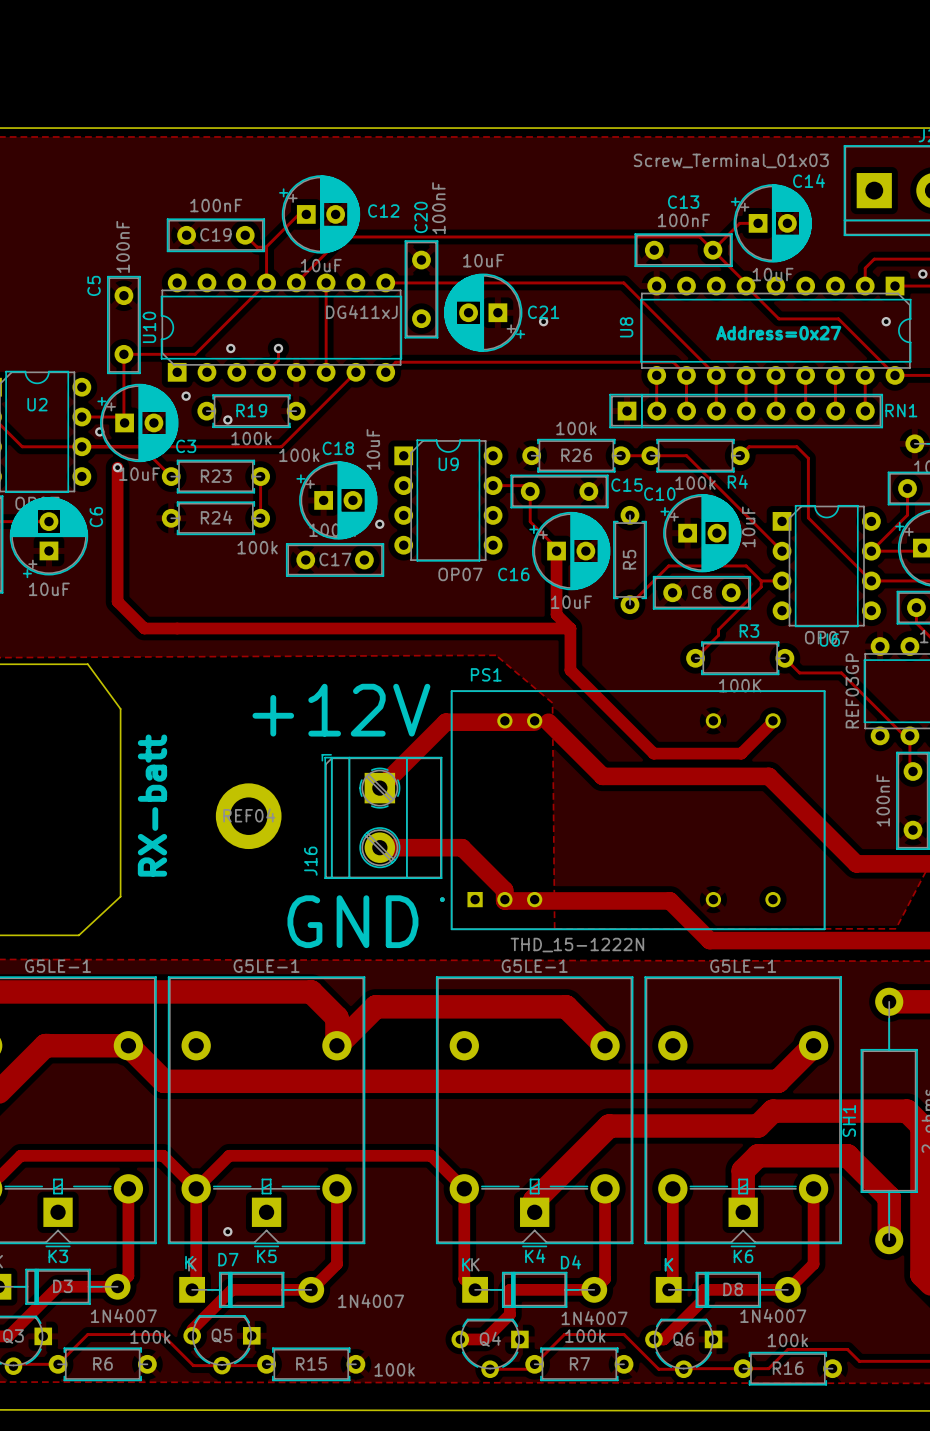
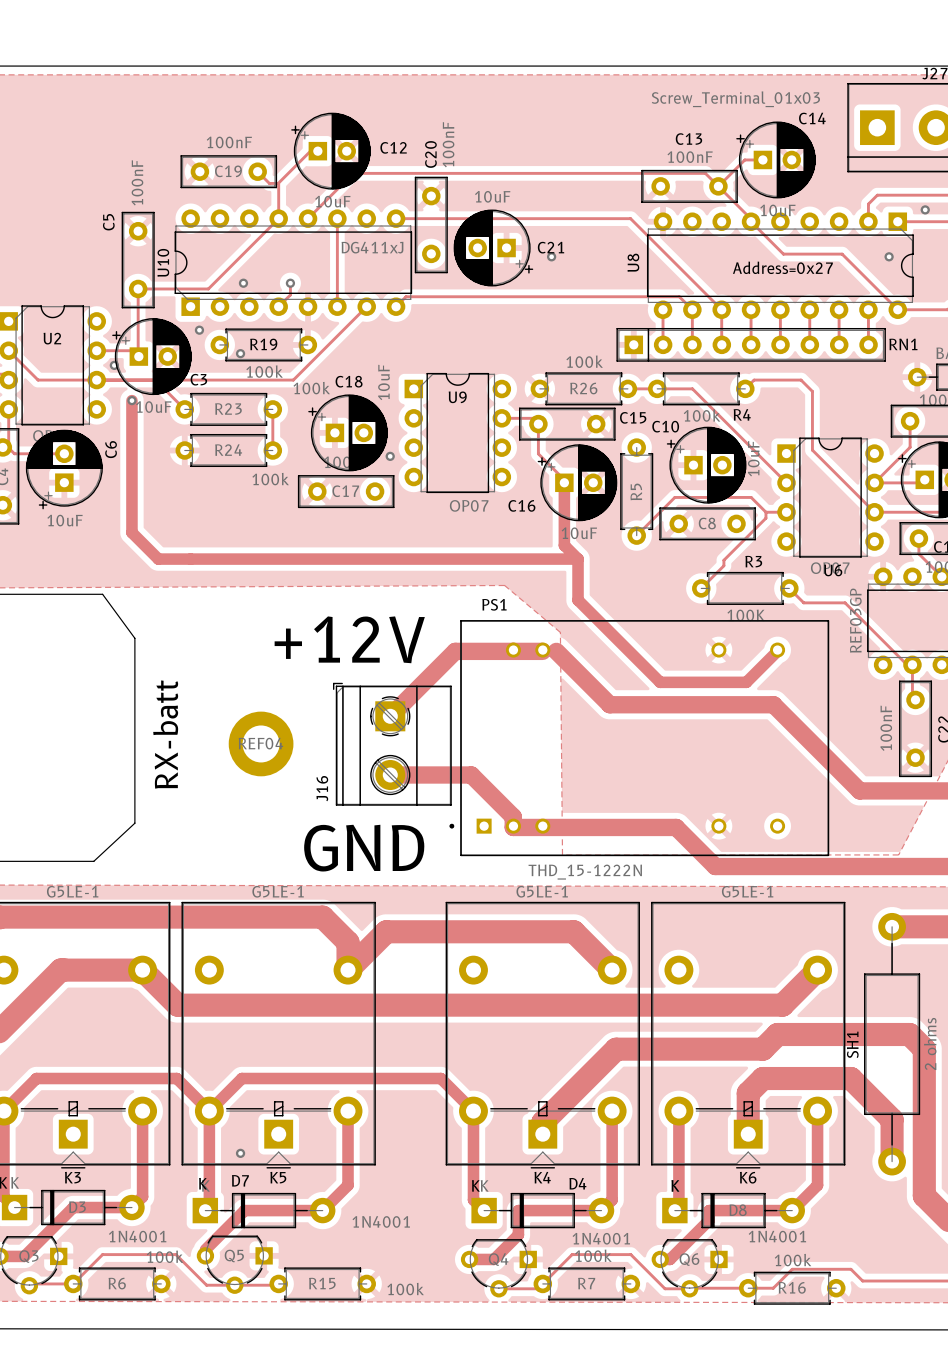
D7 value: 1N4007 (371, 1301) -> 1N4001 (381, 1221)
D3 value: 1N4007 (123, 1315) -> 1N4001 (137, 1236)
D8 value: 1N4007 (773, 1315) -> 1N4001 (777, 1236)
D4 value: 1N4007 (594, 1318) -> 1N4001 (601, 1238)

